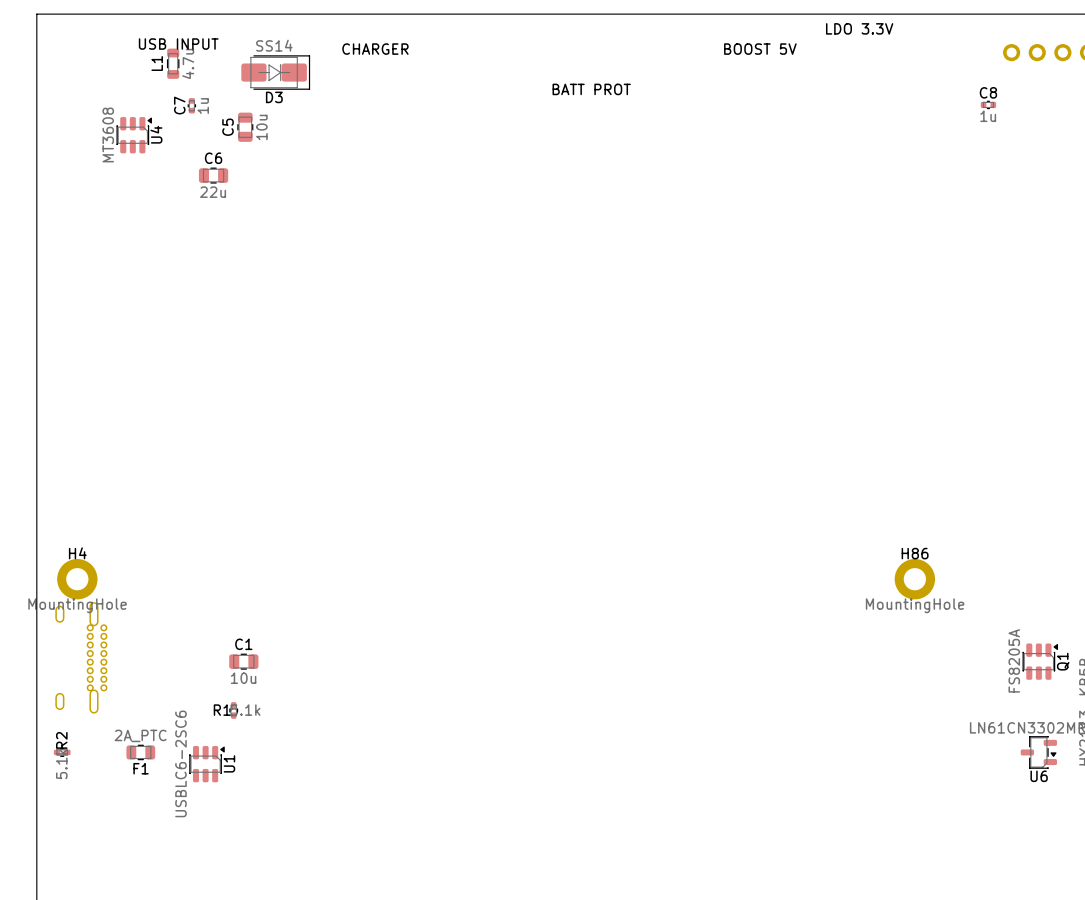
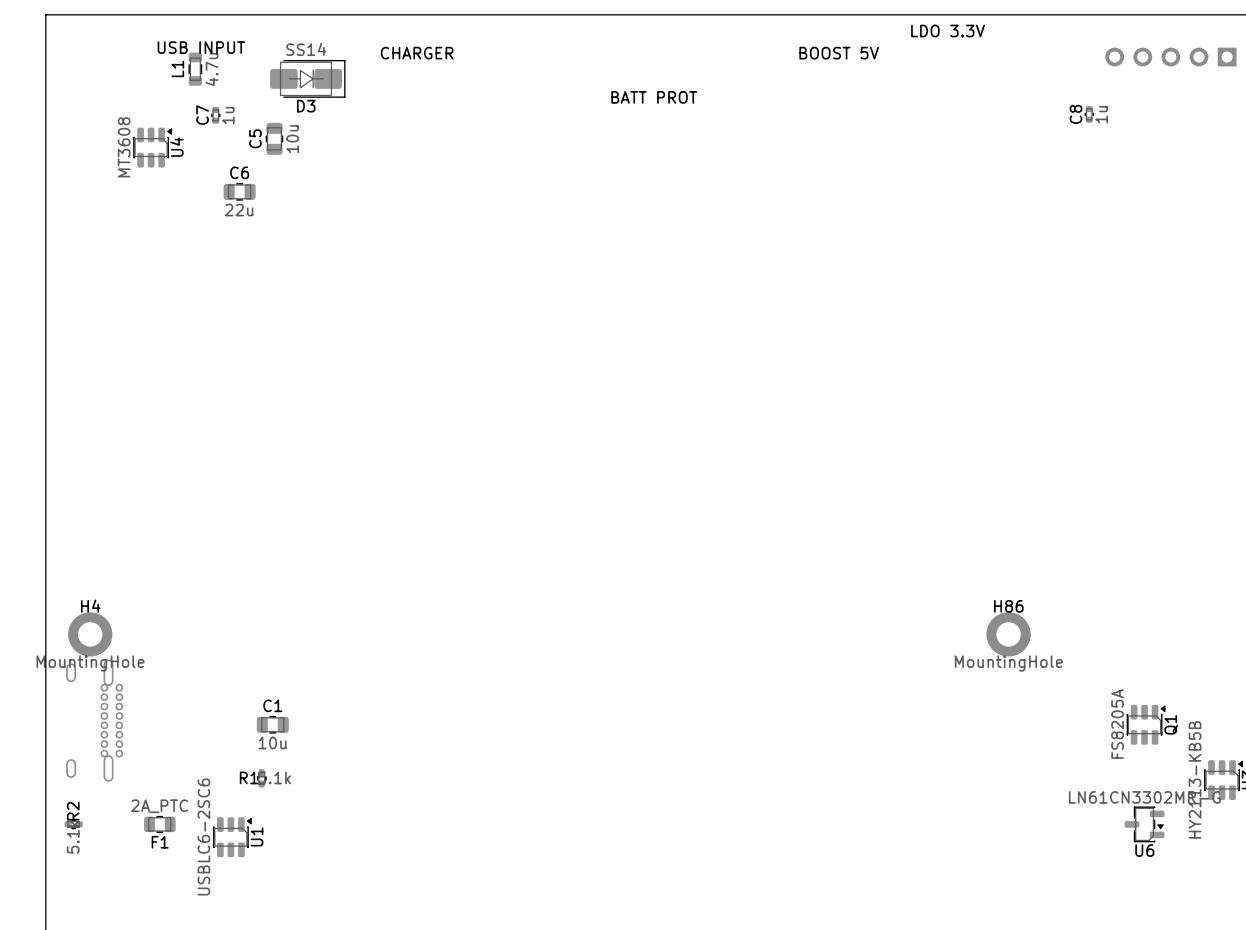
C8 rotation: 0° (988, 104) -> 90° clockwise (1089, 114)

